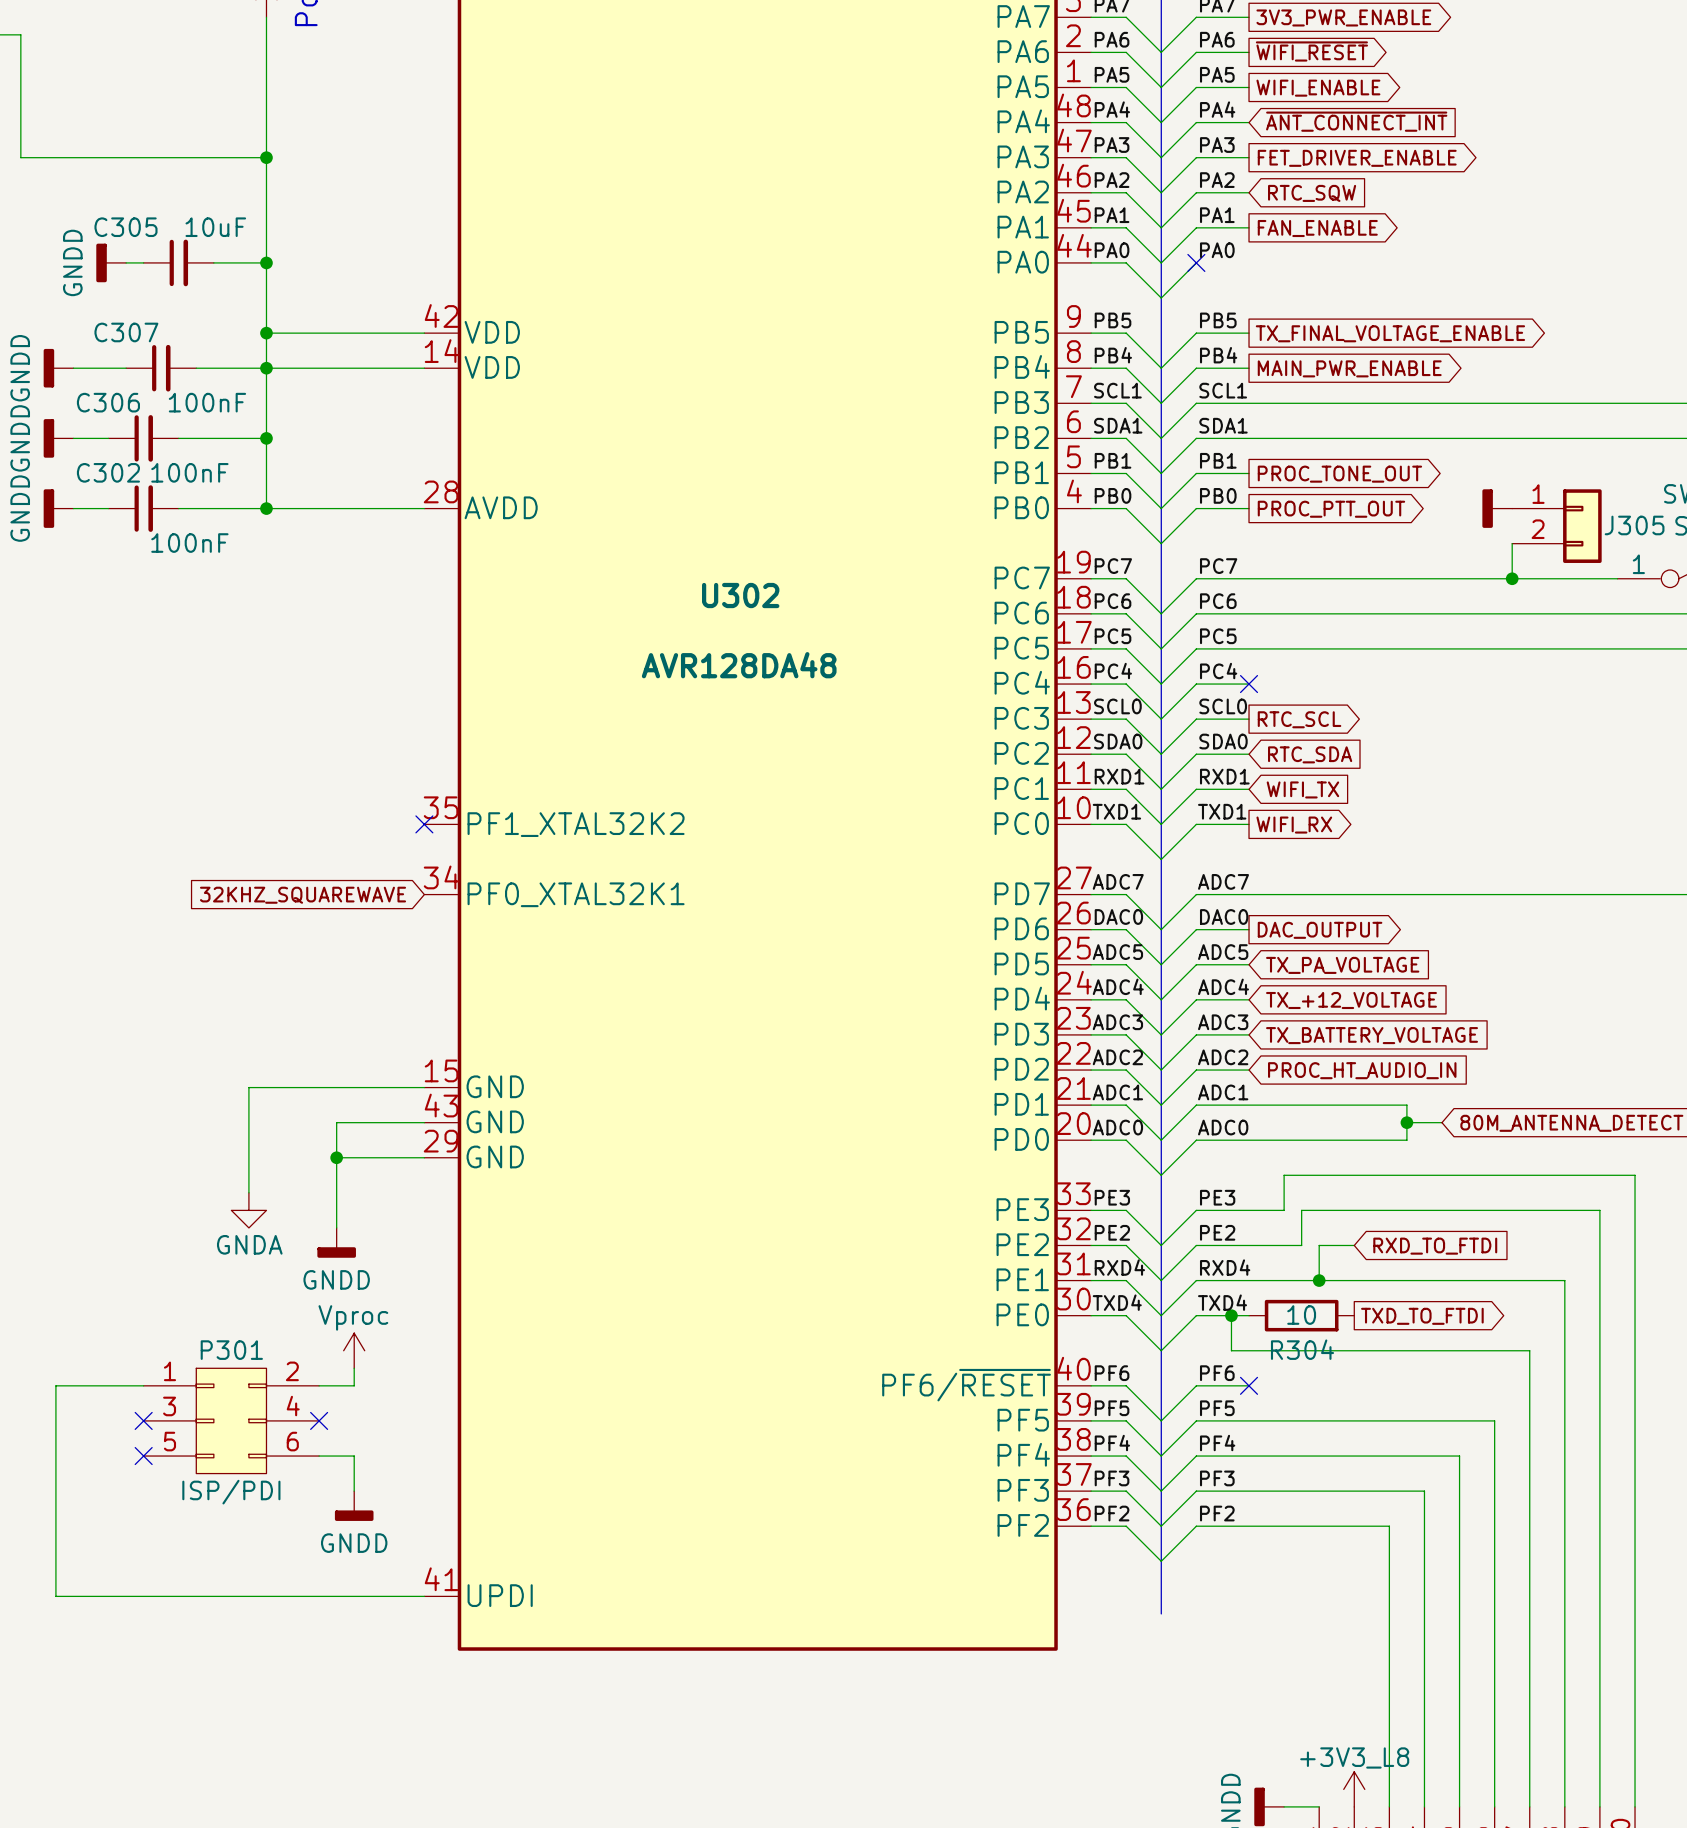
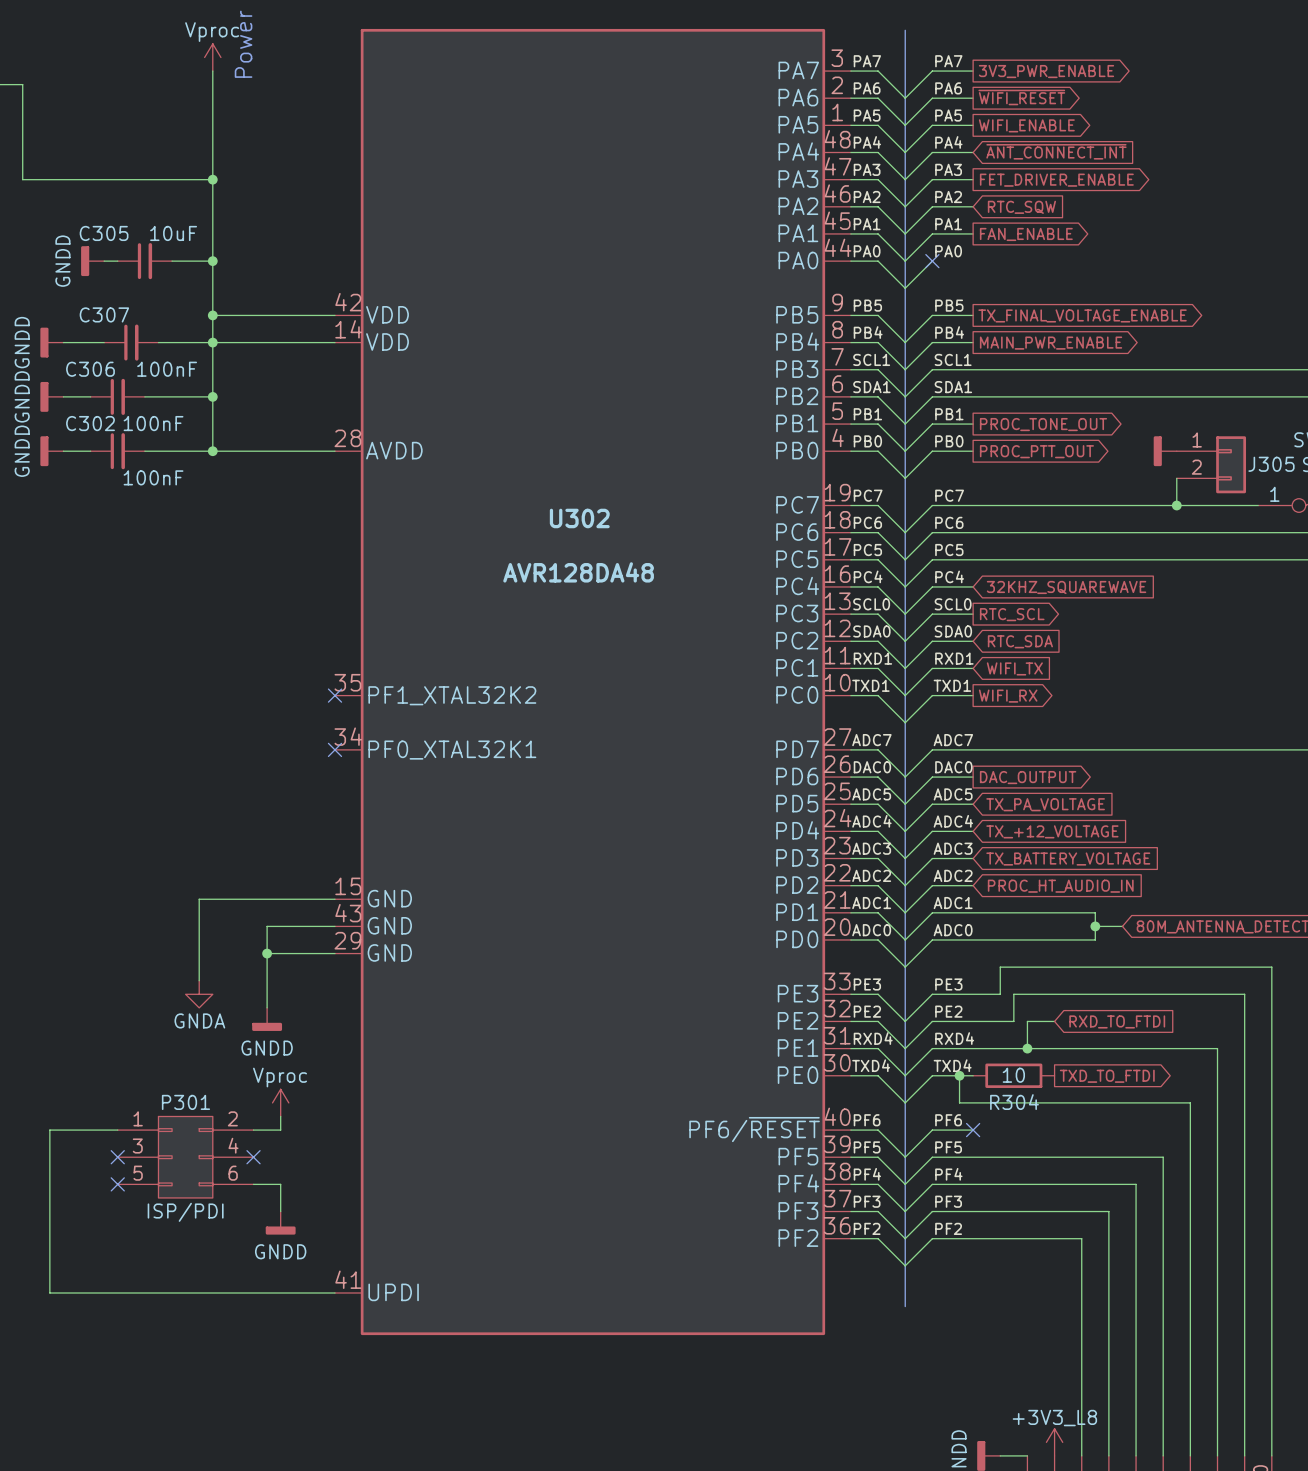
no-connect mark: (1249, 684) -> none
global label: none -> 32KHZ_SQUAREWAVE (1066, 587)
no-connect mark: none -> (334, 749)
global label: 32KHZ_SQUAREWAVE (303, 895) -> none

